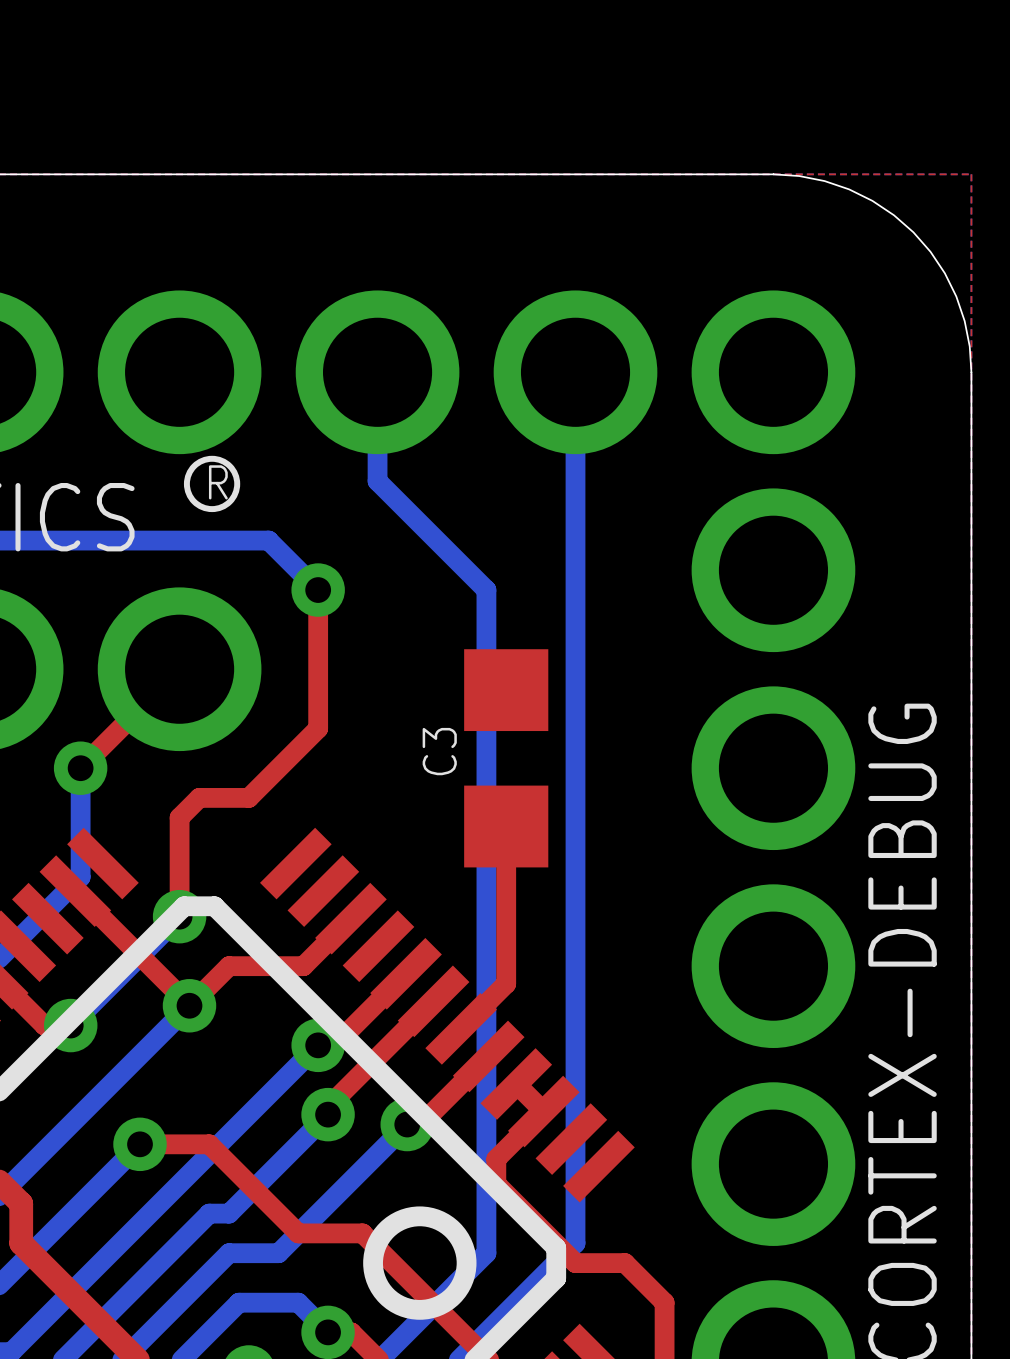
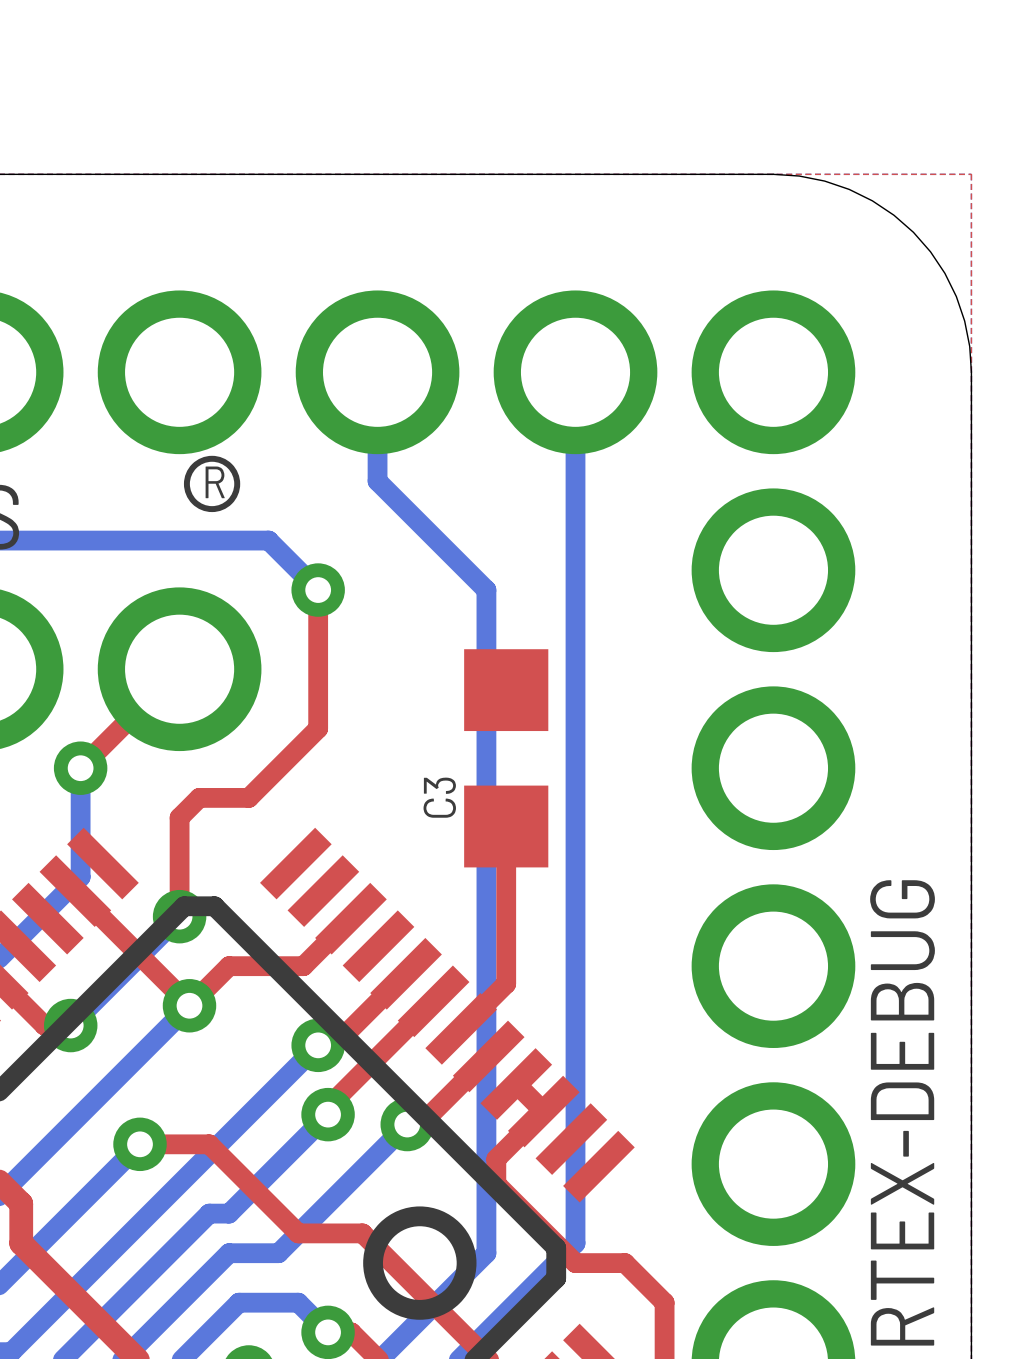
C3 name position: C3 (439, 751) -> C3 (439, 797)

